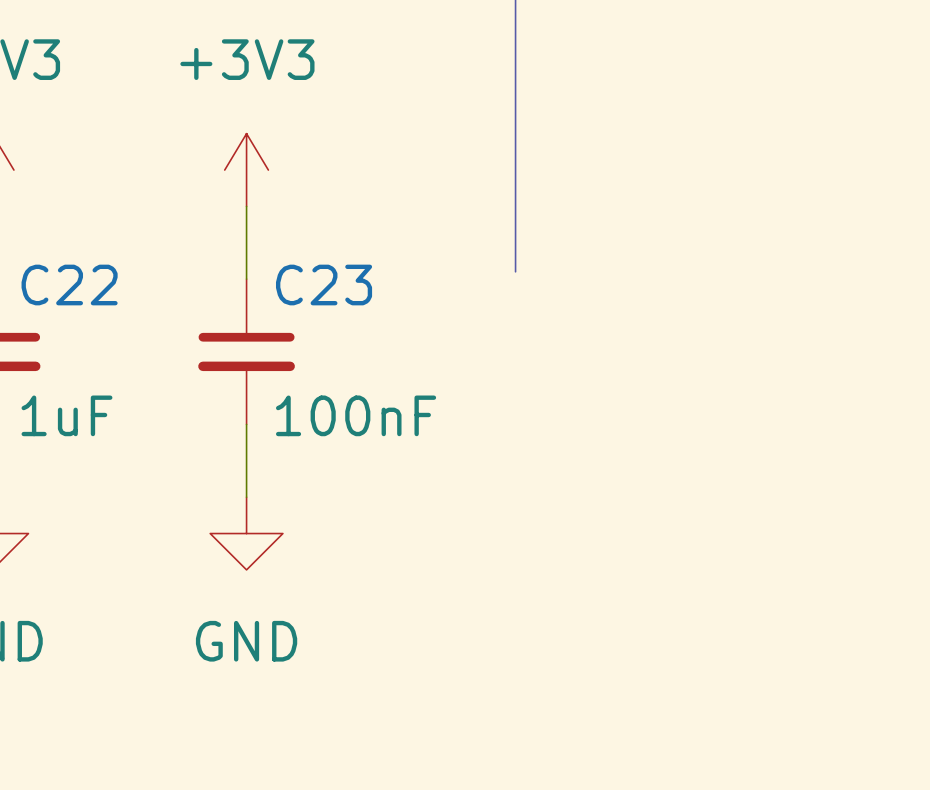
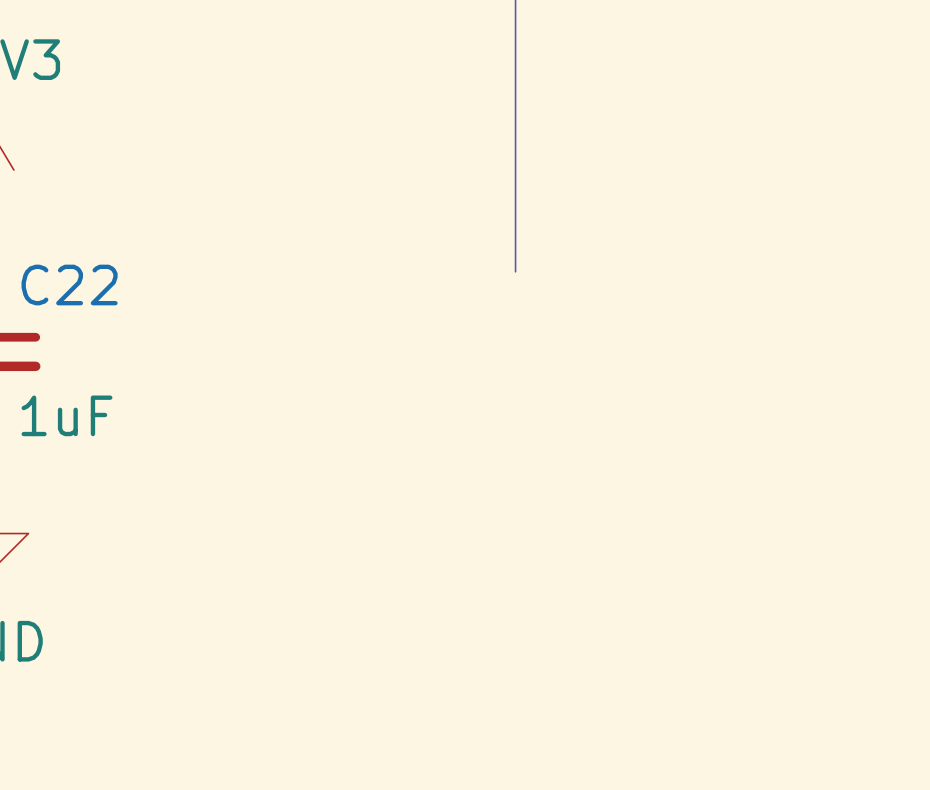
power symbol: +3V3 (246, 170) -> none
wire: (246, 206) (246, 279) -> none
C23: 100nF (246, 351) -> none
wire: (246, 424) (246, 497) -> none
power symbol: GND (246, 533) -> none

